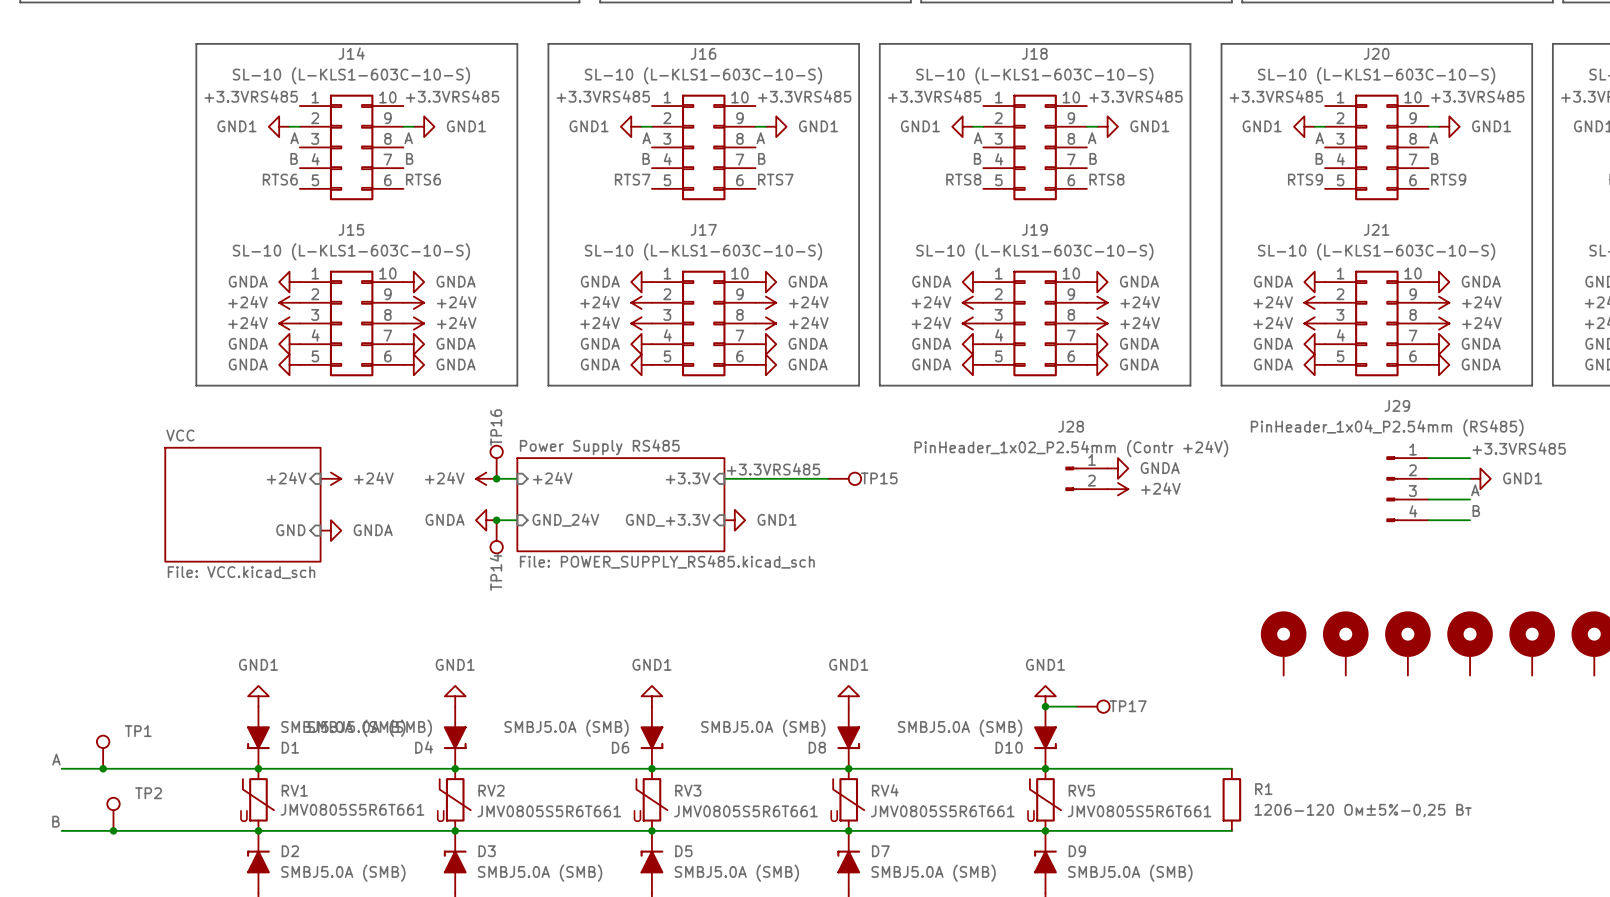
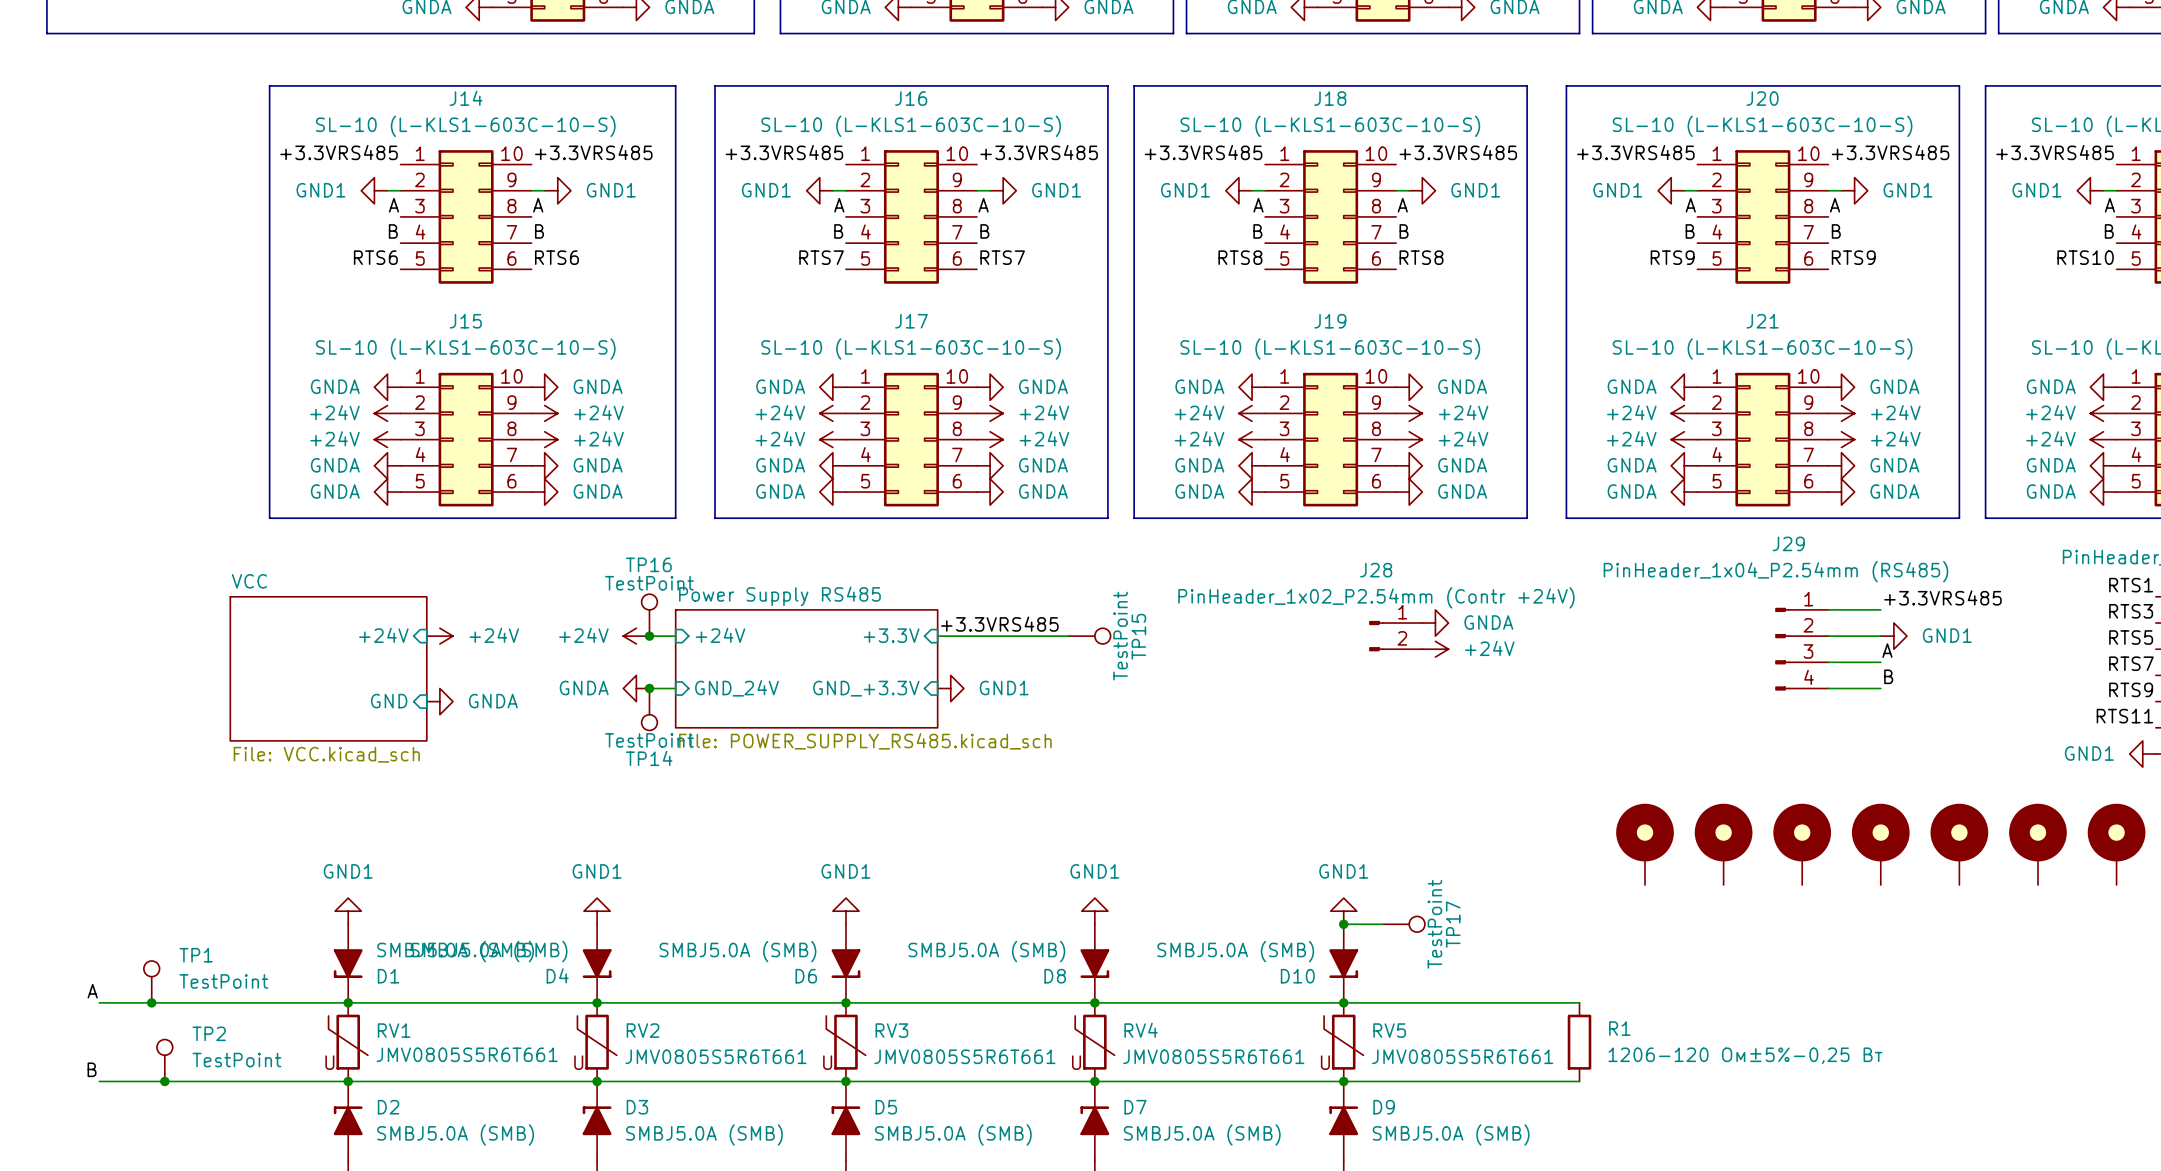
TP16 name rotation: 0° (496, 427) -> 90° clockwise (648, 564)
TP16 value: none -> TestPoint (649, 583)
TP15 value: none -> TestPoint (1120, 636)
TP15 name rotation: 0° (879, 478) -> 90° counterclockwise (1138, 636)
TP14 value: none -> TestPoint (649, 740)
TP14 name rotation: 0° (496, 572) -> 90° clockwise (649, 758)
TP17 value: none -> TestPoint (1434, 924)
TP17 name rotation: 0° (1128, 706) -> 90° counterclockwise (1453, 924)
TP1 value: none -> TestPoint (223, 981)
TP2 value: none -> TestPoint (236, 1060)

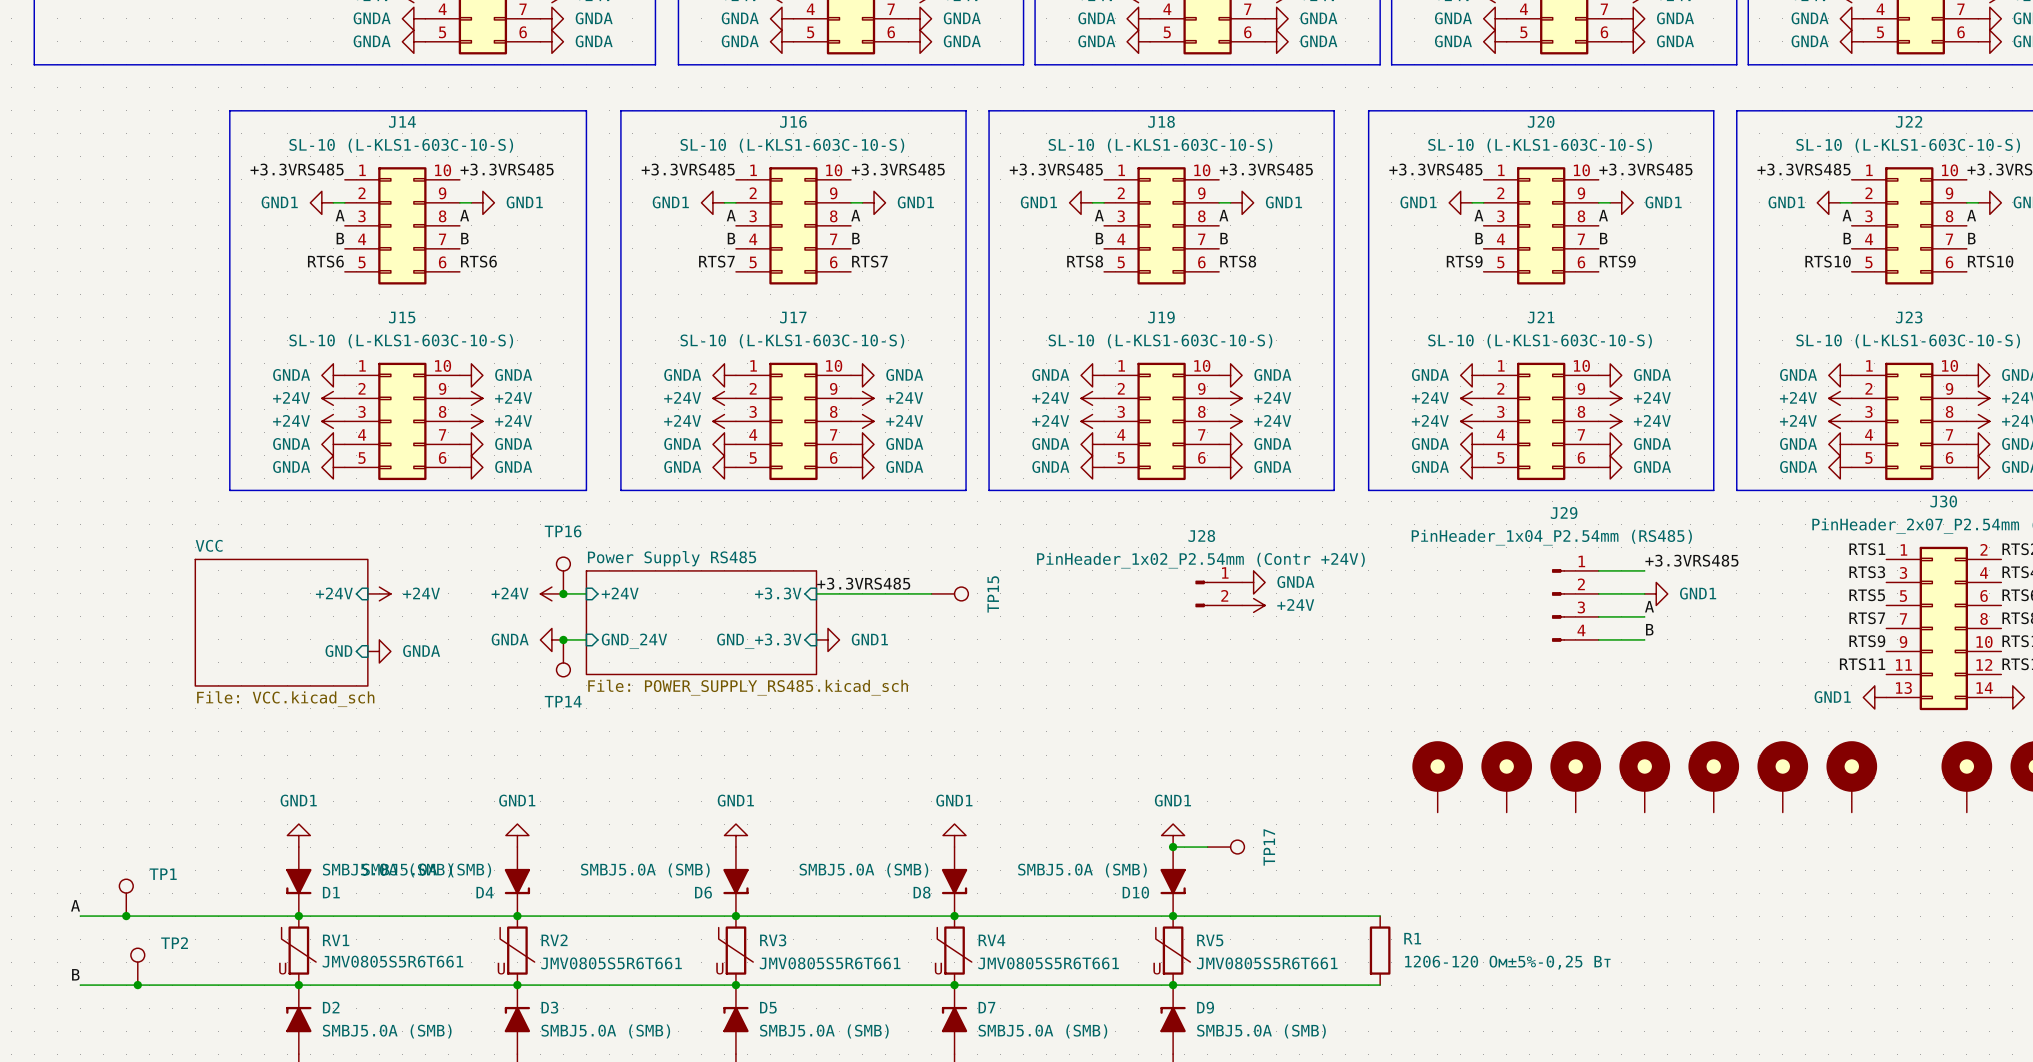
TP16 value: TestPoint (649, 583) -> none
TP15 value: TestPoint (1120, 636) -> none
TP14 value: TestPoint (649, 740) -> none
TP17 value: TestPoint (1434, 924) -> none
TP1 value: TestPoint (223, 981) -> none
TP2 value: TestPoint (236, 1060) -> none

